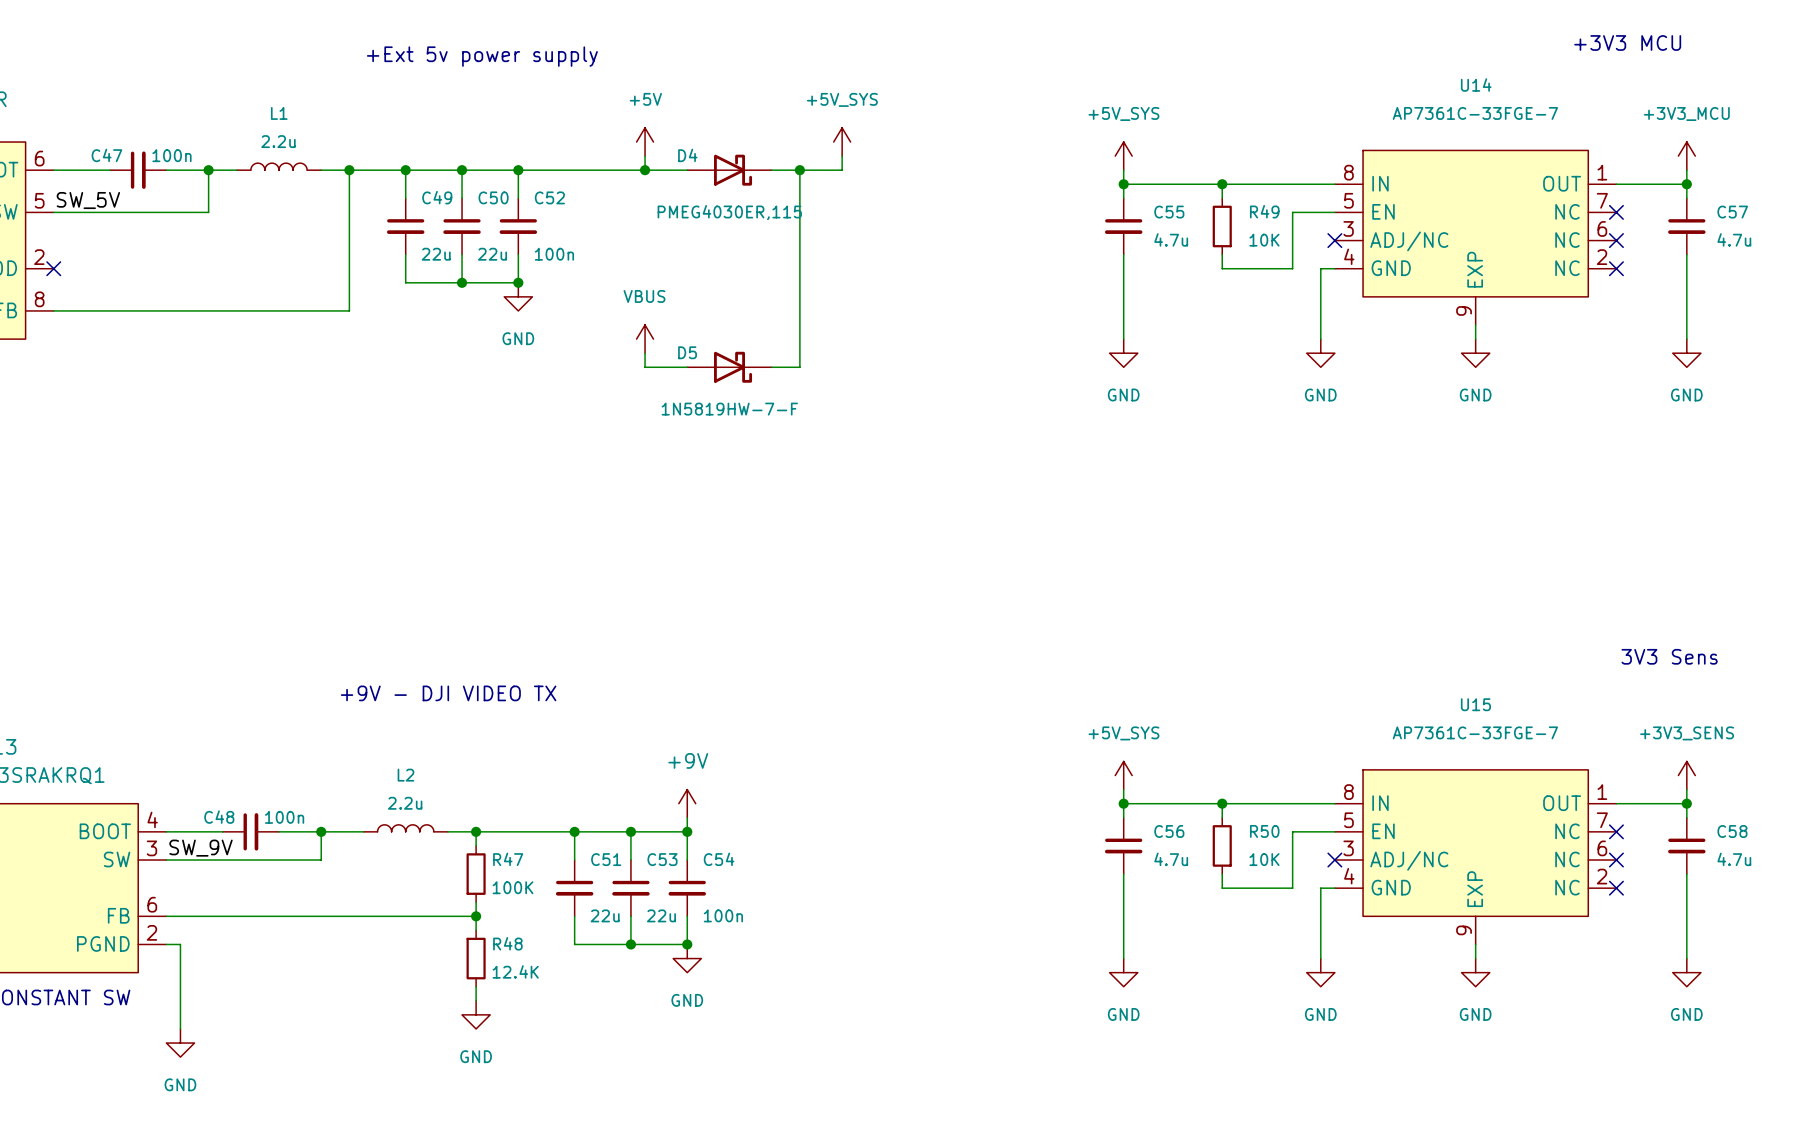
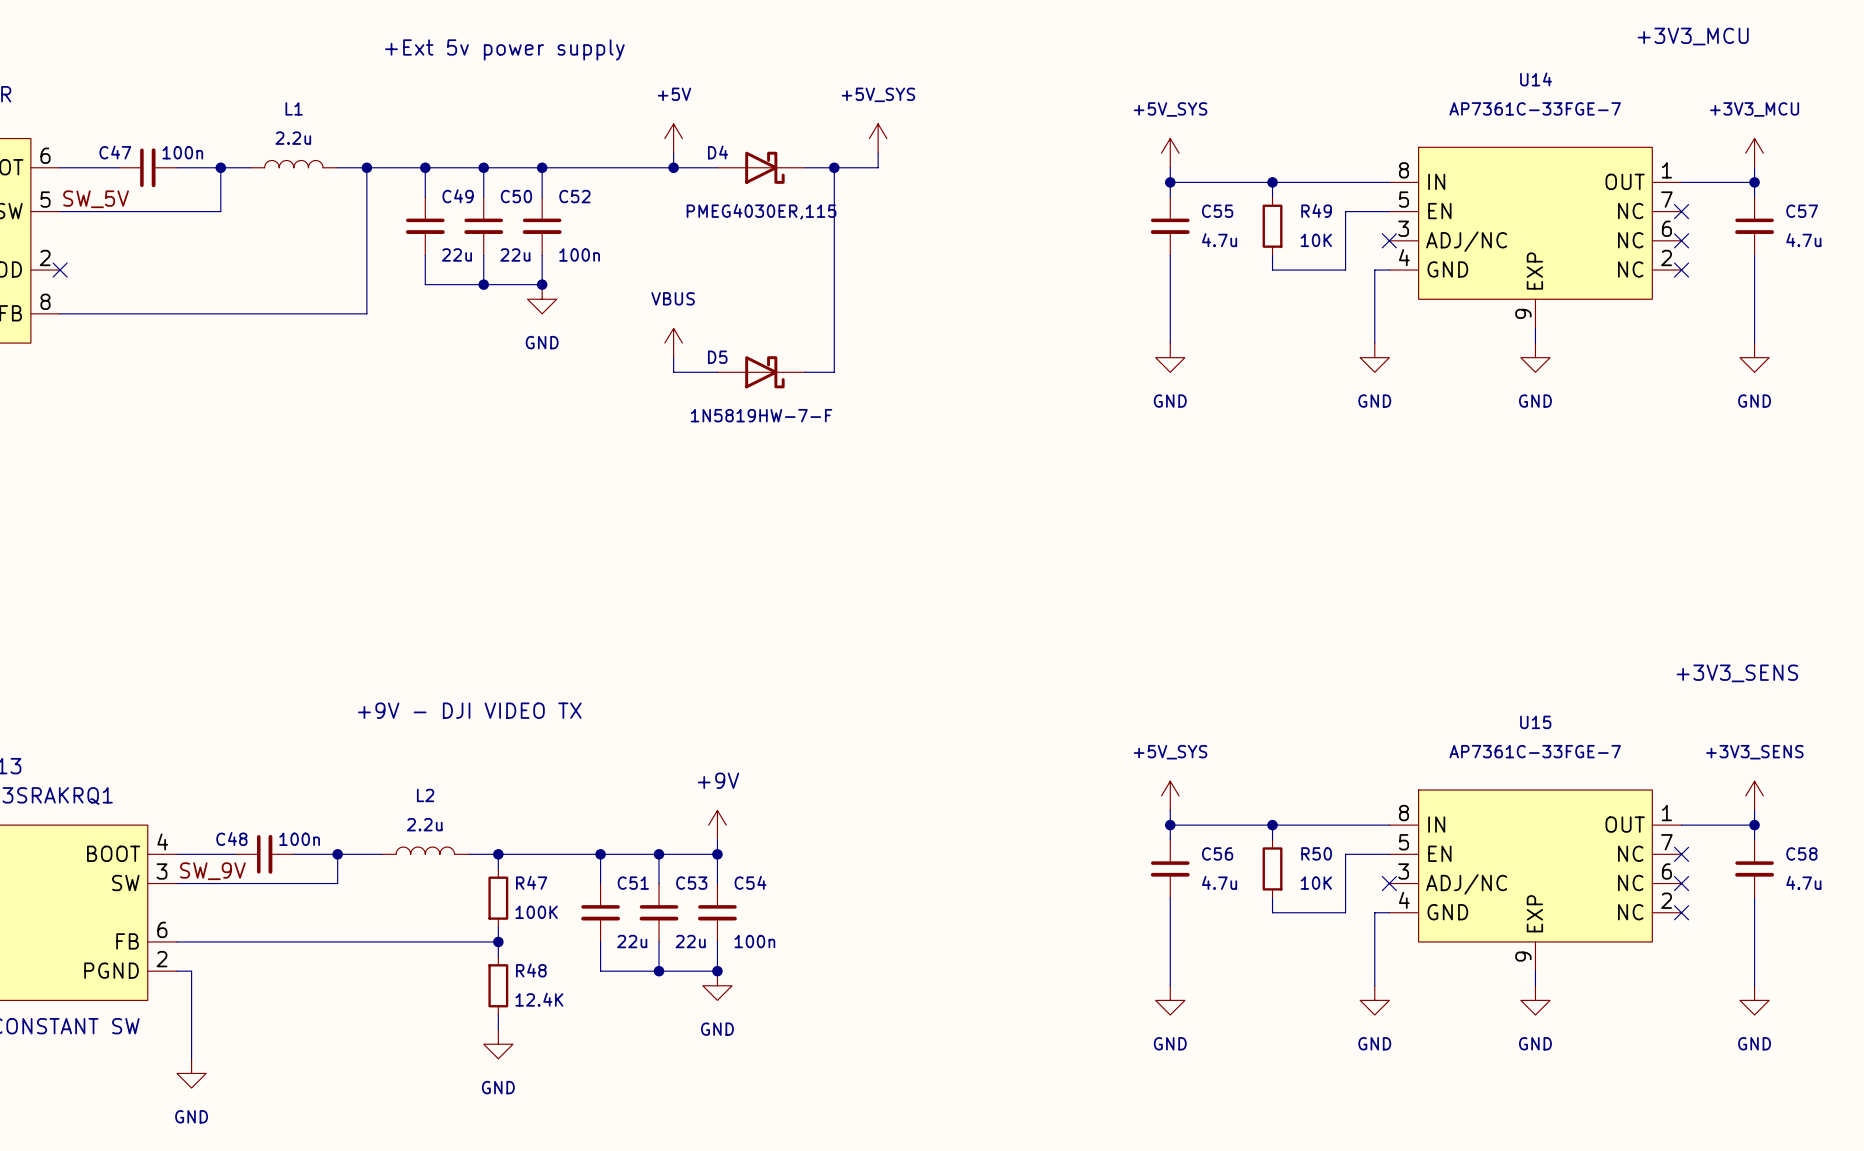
text: +3V3 MCU (1627, 42) -> +3V3_MCU (1693, 36)
text: 3V3 Sens (1669, 656) -> +3V3_SENS (1737, 673)

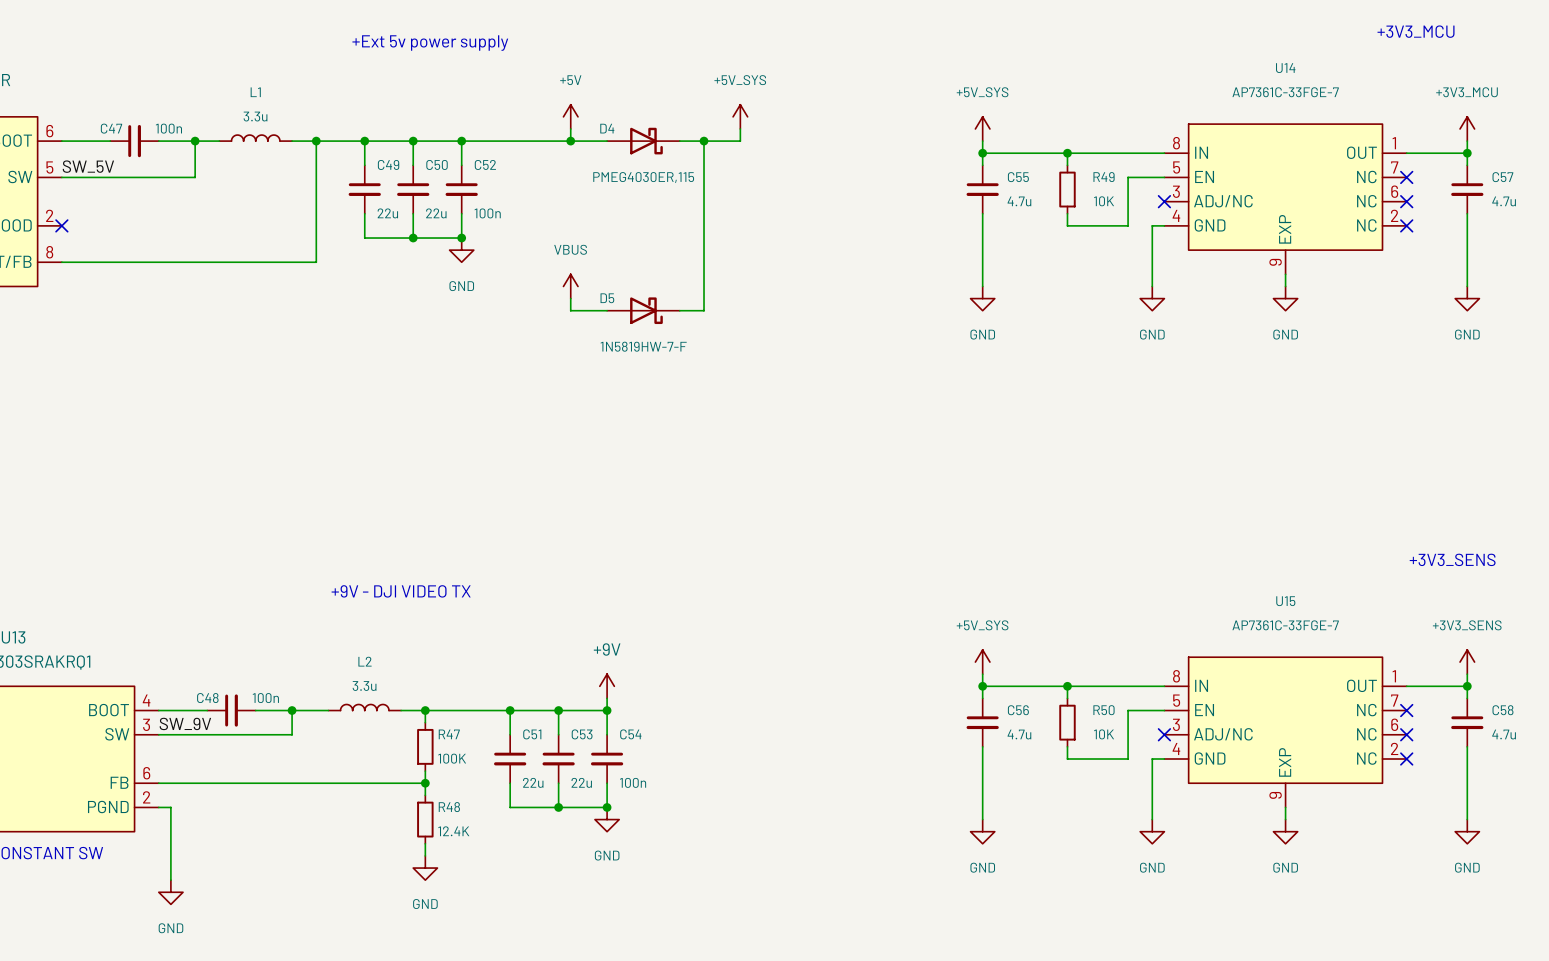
L1 value: 2.2u (293, 138) -> 3.3u (255, 116)
L2 value: 2.2u (424, 824) -> 3.3u (364, 685)

